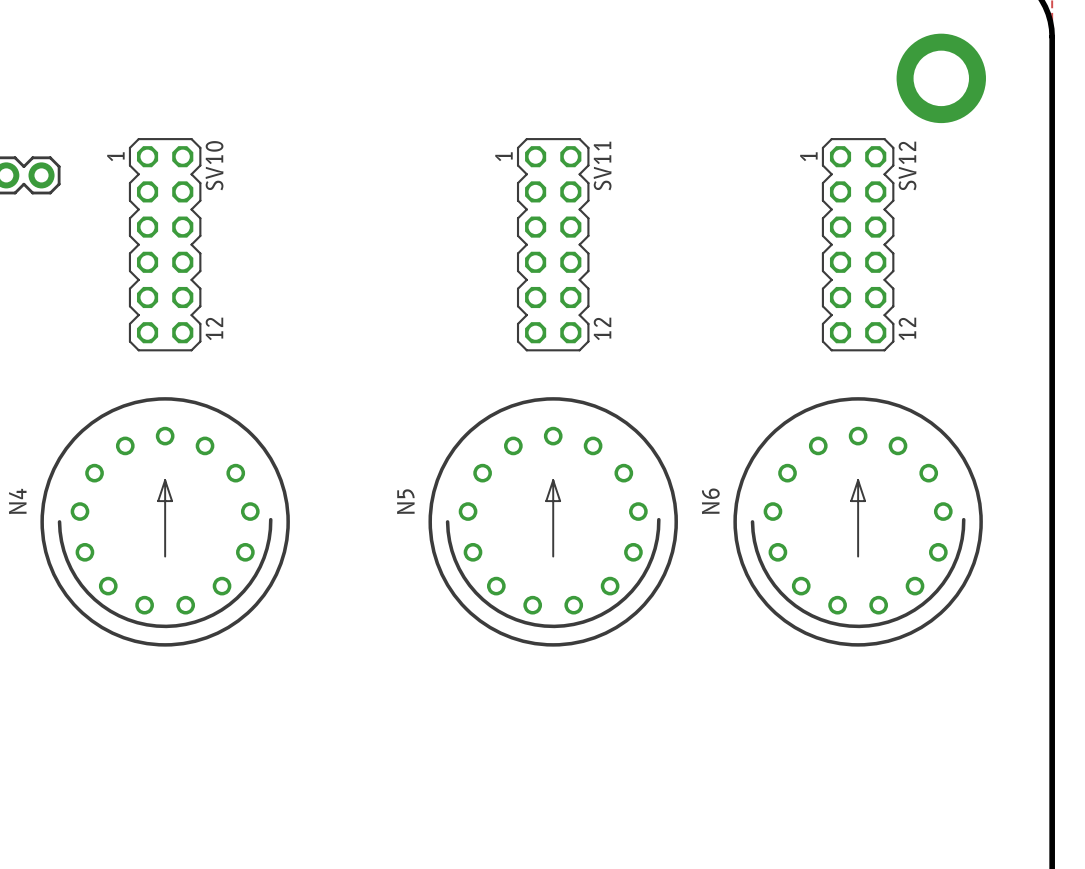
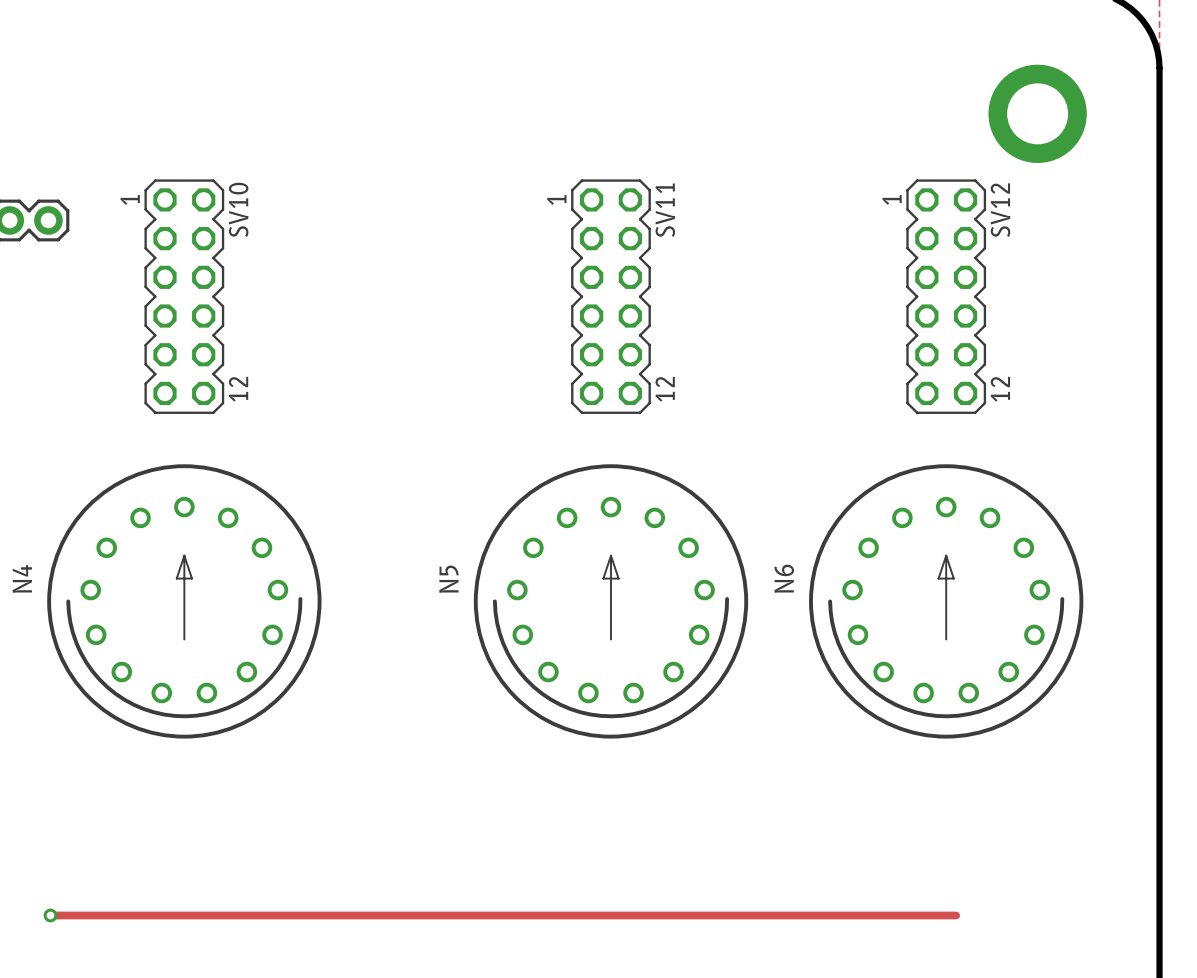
track: none -> (50, 915) (956, 915)
via: none -> (50, 915)

